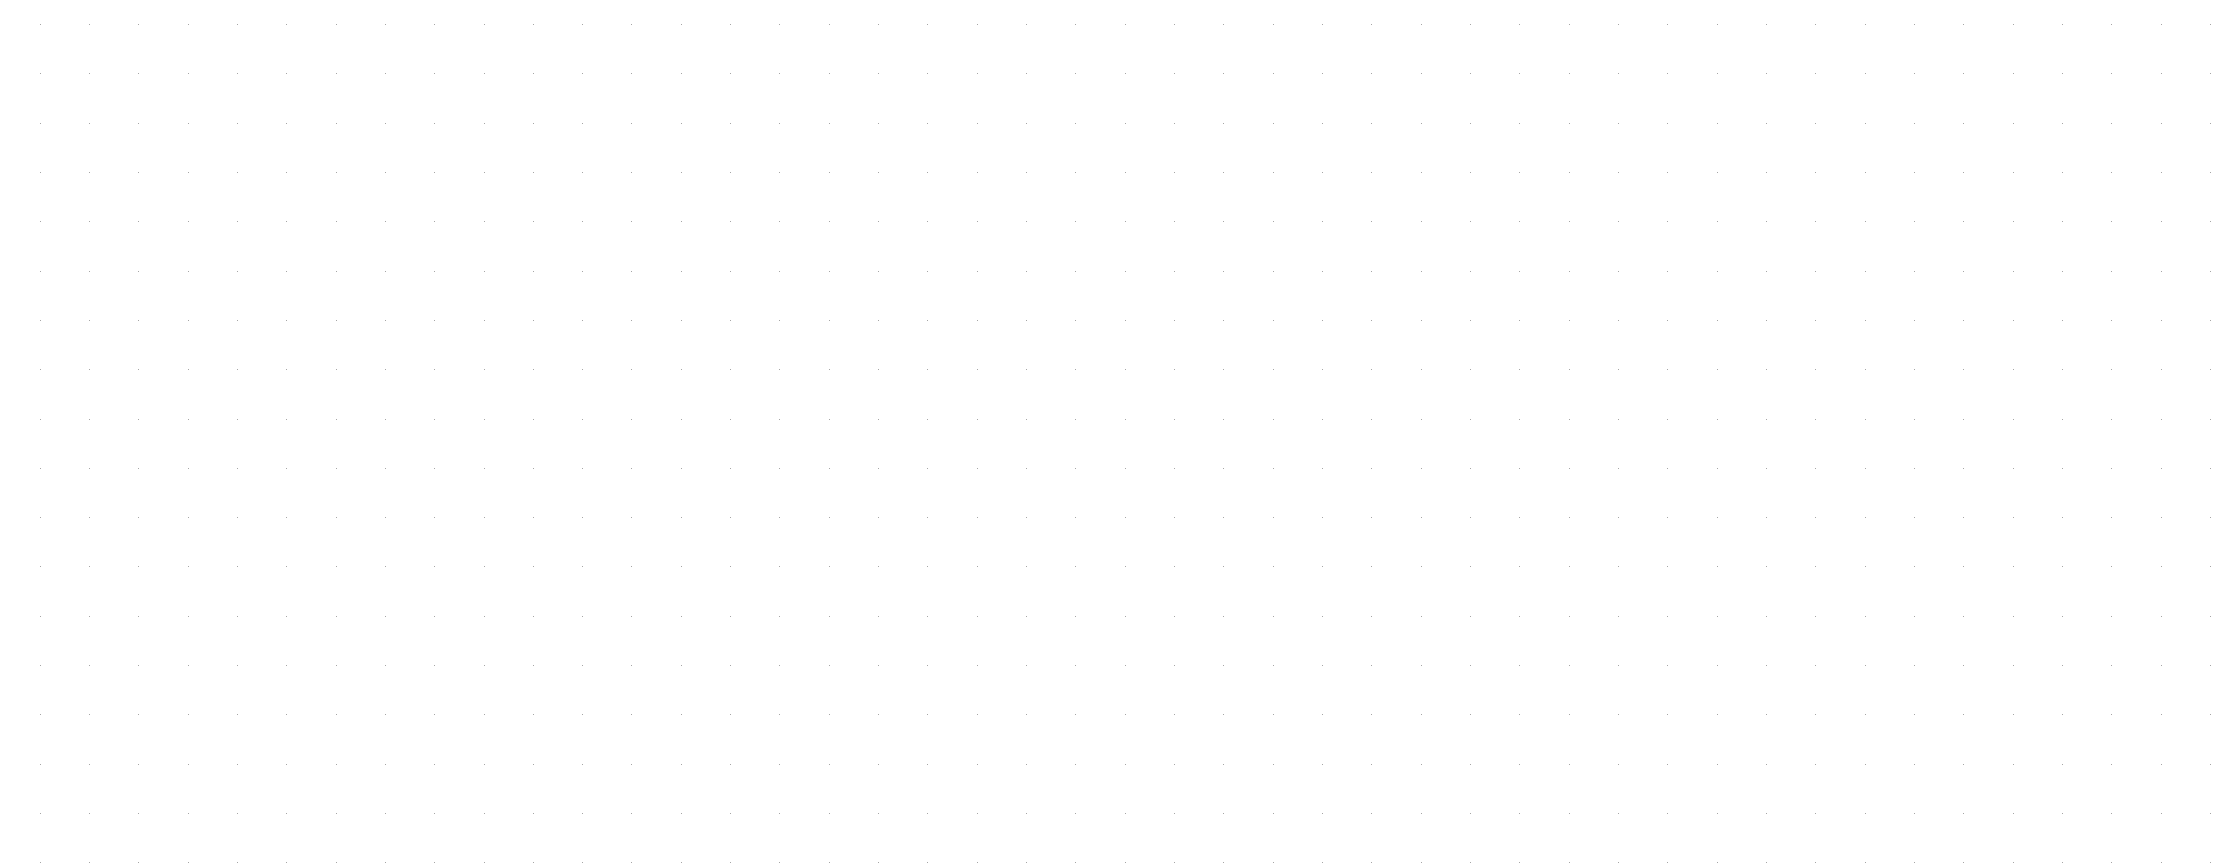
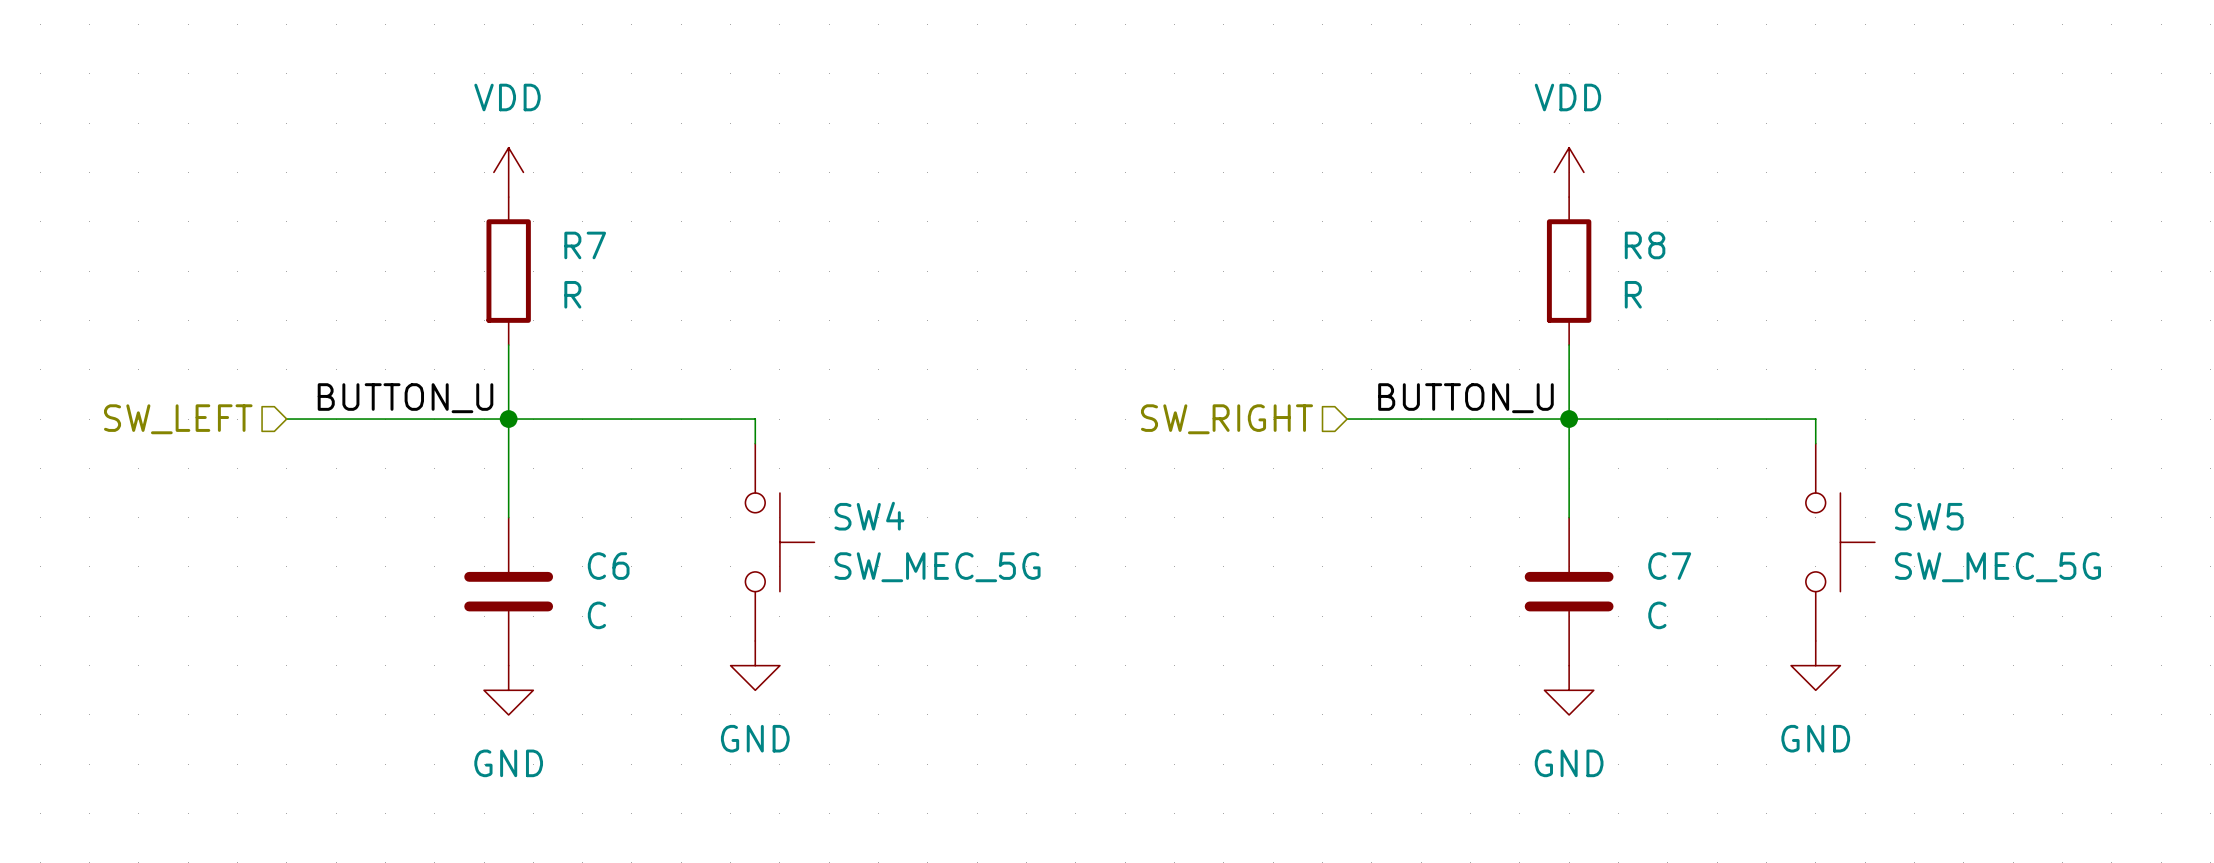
power symbol: none -> VDD (508, 172)
power symbol: none -> VDD (1569, 172)
R7: none -> R (508, 271)
R8: none -> R (1569, 271)
wire: none -> (508, 345) (508, 517)
wire: none -> (1569, 345) (1569, 517)
label: none -> BUTTON_U (405, 398)
label: none -> BUTTON_U (1465, 398)
hierarchical label: none -> SW_LEFT (178, 419)
wire: none -> (286, 419) (755, 419) (755, 443)
junction: none -> (508, 419)
hierarchical label: none -> SW_RIGHT (1226, 419)
wire: none -> (1347, 419) (1815, 419) (1815, 443)
junction: none -> (1569, 419)
SW4: none -> SW_MEC_5G (779, 542)
SW5: none -> SW_MEC_5G (1840, 542)
C6: none -> C (508, 591)
C7: none -> C (1569, 591)
power symbol: none -> GND (755, 665)
power symbol: none -> GND (1815, 665)
power symbol: none -> GND (508, 690)
power symbol: none -> GND (1569, 690)

